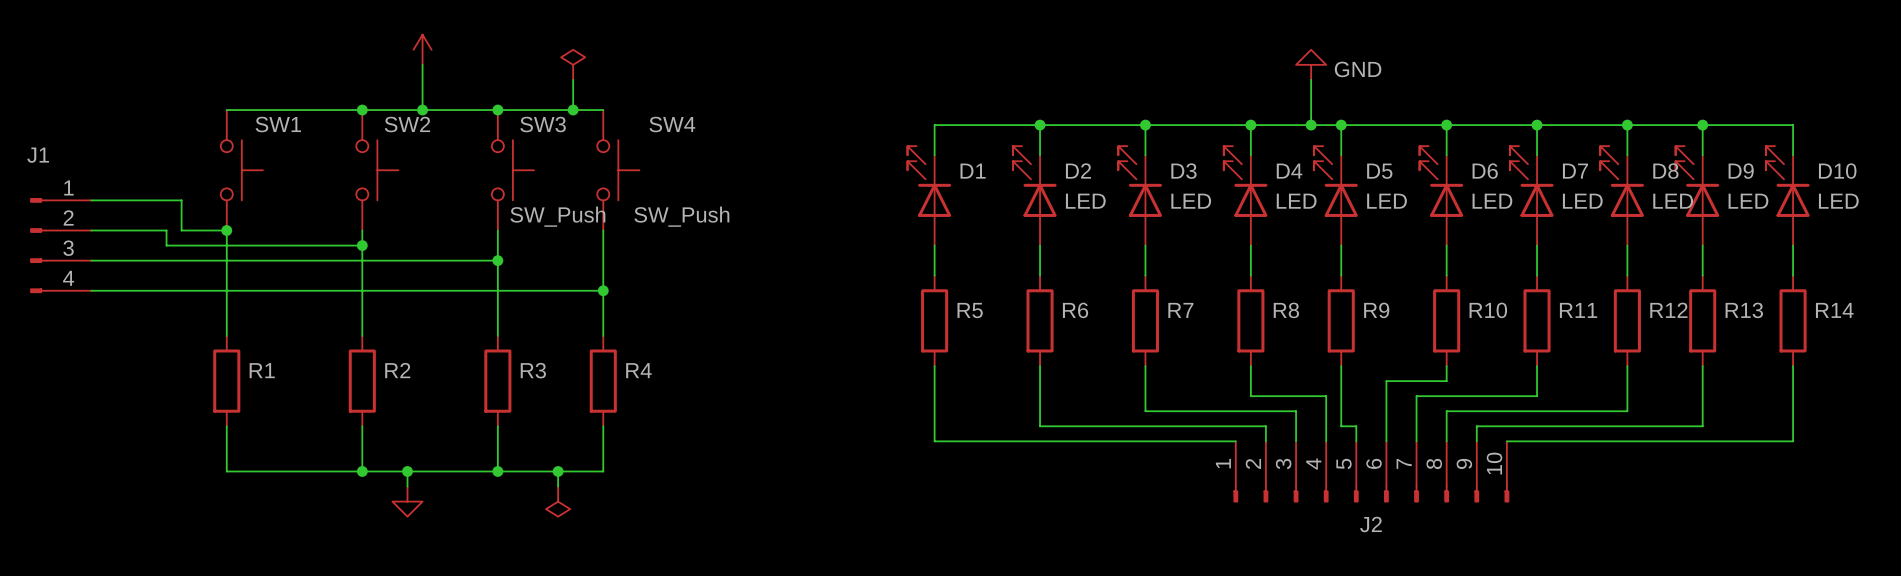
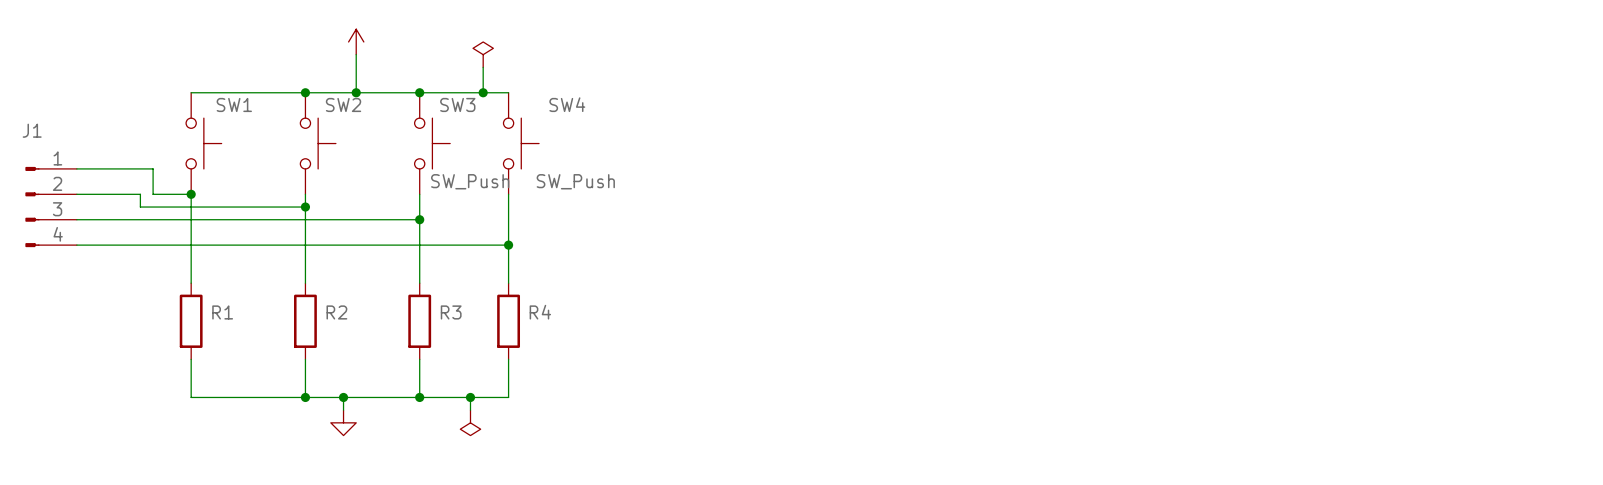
power symbol: GND (1311, 64) -> none
wire: (1311, 79) (1311, 125) -> none
wire: (1040, 125) (1040, 155) -> none
junction: (1040, 125) -> none
wire: (1145, 125) (1145, 155) -> none
junction: (1145, 125) -> none
wire: (1250, 125) (1250, 155) -> none
junction: (1250, 125) -> none
junction: (1311, 125) -> none
wire: (1341, 125) (1341, 155) -> none
junction: (1341, 125) -> none
wire: (1446, 125) (1446, 155) -> none
junction: (1446, 125) -> none
wire: (1537, 125) (1537, 155) -> none
junction: (1537, 125) -> none
wire: (1627, 125) (1627, 155) -> none
junction: (1627, 125) -> none
wire: (1702, 125) (1702, 155) -> none
junction: (1702, 125) -> none
wire: (934, 155) (934, 125) (1793, 125) (1793, 155) -> none
D1: (929, 195) -> none
D2: LED (1034, 195) -> none
D3: LED (1140, 195) -> none
D4: LED (1245, 195) -> none
D5: LED (1335, 195) -> none
D6: LED (1441, 195) -> none
D7: LED (1531, 195) -> none
D8: LED (1622, 195) -> none
D9: LED (1697, 195) -> none
D10: LED (1787, 195) -> none
wire: (934, 245) (934, 275) -> none
wire: (1040, 245) (1040, 275) -> none
wire: (1145, 245) (1145, 275) -> none
wire: (1250, 245) (1250, 275) -> none
wire: (1341, 245) (1341, 275) -> none
wire: (1446, 245) (1446, 275) -> none
wire: (1537, 245) (1537, 275) -> none
wire: (1627, 245) (1627, 275) -> none
wire: (1702, 245) (1702, 275) -> none
wire: (1793, 245) (1793, 275) -> none
R5: (934, 320) -> none
R6: (1040, 320) -> none
R7: (1145, 320) -> none
R8: (1250, 320) -> none
R9: (1341, 320) -> none
R10: (1446, 320) -> none
R11: (1537, 320) -> none
R12: (1627, 320) -> none
R13: (1702, 320) -> none
R14: (1793, 320) -> none
wire: (934, 366) (934, 441) (1235, 441) -> none
wire: (1040, 366) (1040, 426) (1265, 426) (1265, 441) -> none
wire: (1145, 366) (1145, 411) (1296, 411) (1296, 441) -> none
wire: (1250, 366) (1250, 396) (1326, 396) (1326, 441) -> none
wire: (1341, 366) (1341, 426) (1356, 426) (1356, 441) -> none
wire: (1446, 366) (1446, 381) (1386, 381) (1386, 441) -> none
wire: (1537, 366) (1537, 396) (1416, 396) (1416, 441) -> none
wire: (1627, 366) (1627, 411) (1446, 411) (1446, 441) -> none
wire: (1702, 366) (1702, 426) (1476, 426) (1476, 441) -> none
wire: (1793, 366) (1793, 441) (1506, 441) -> none
J2: (1371, 471) -> none

